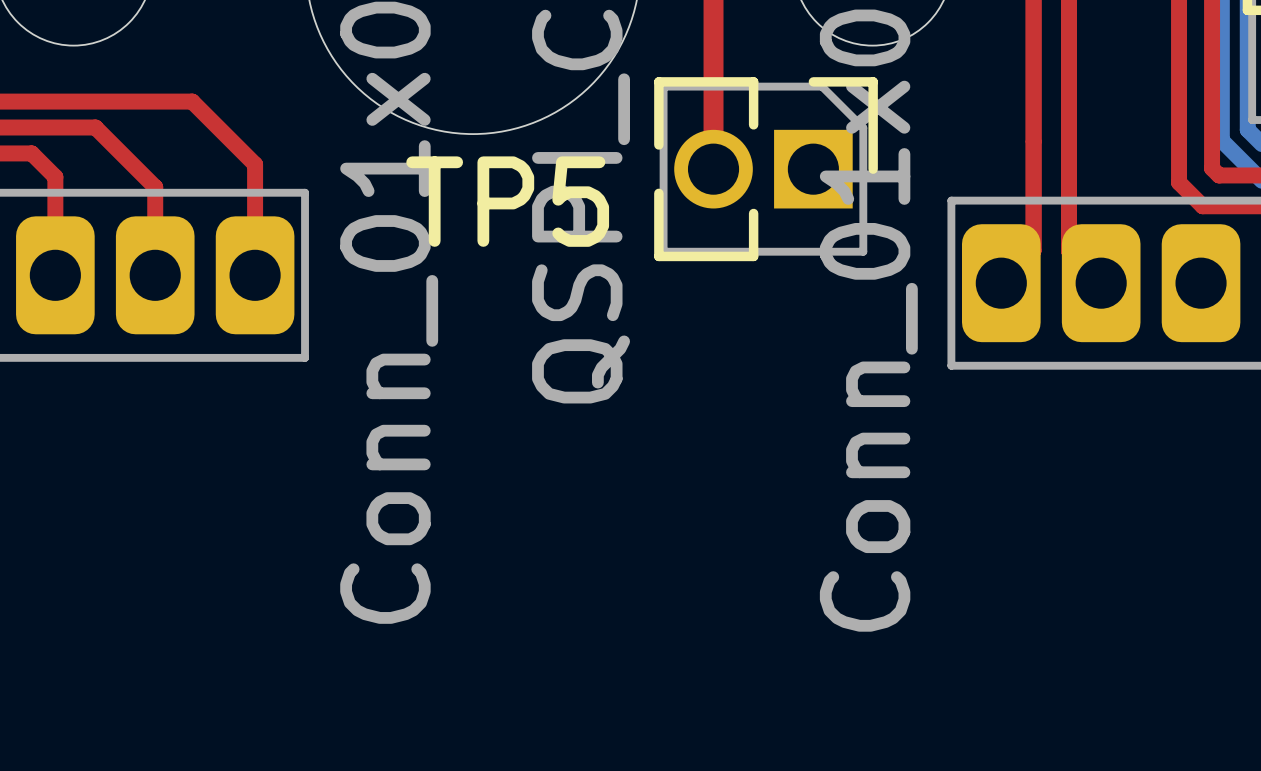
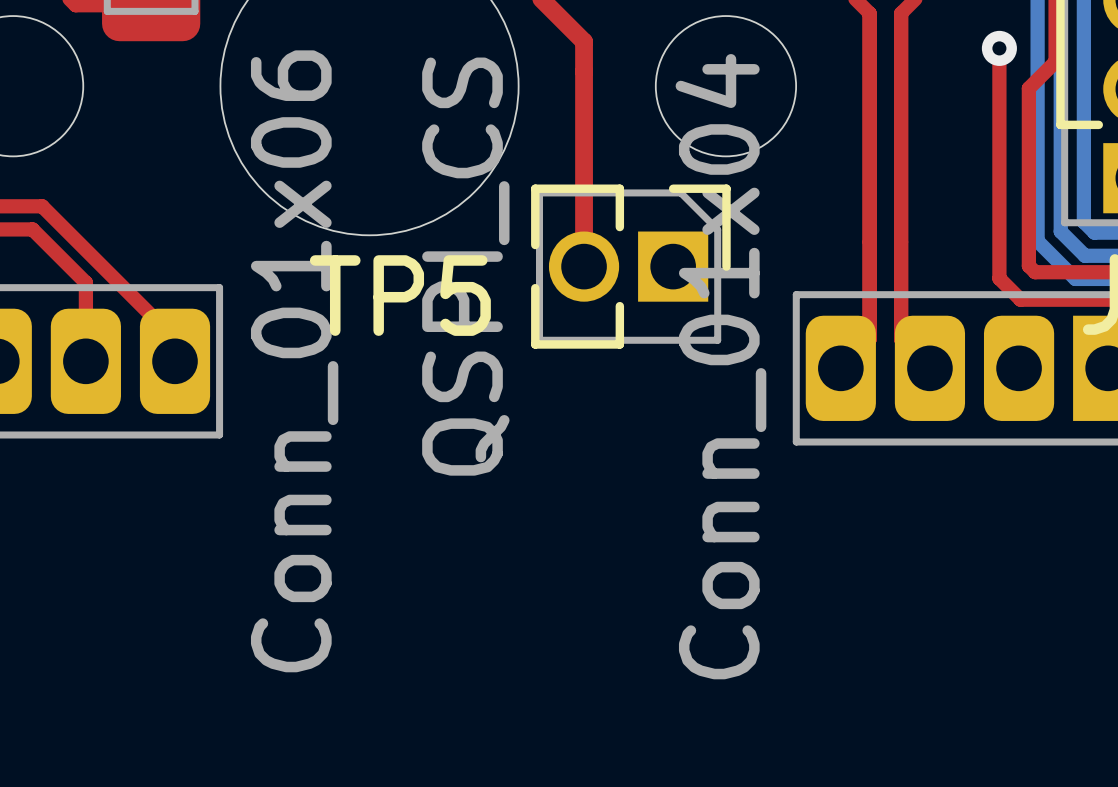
top track: (106, 101) (192, 101) (255, 164) (255, 250) -> (42, 206) (175, 339)

